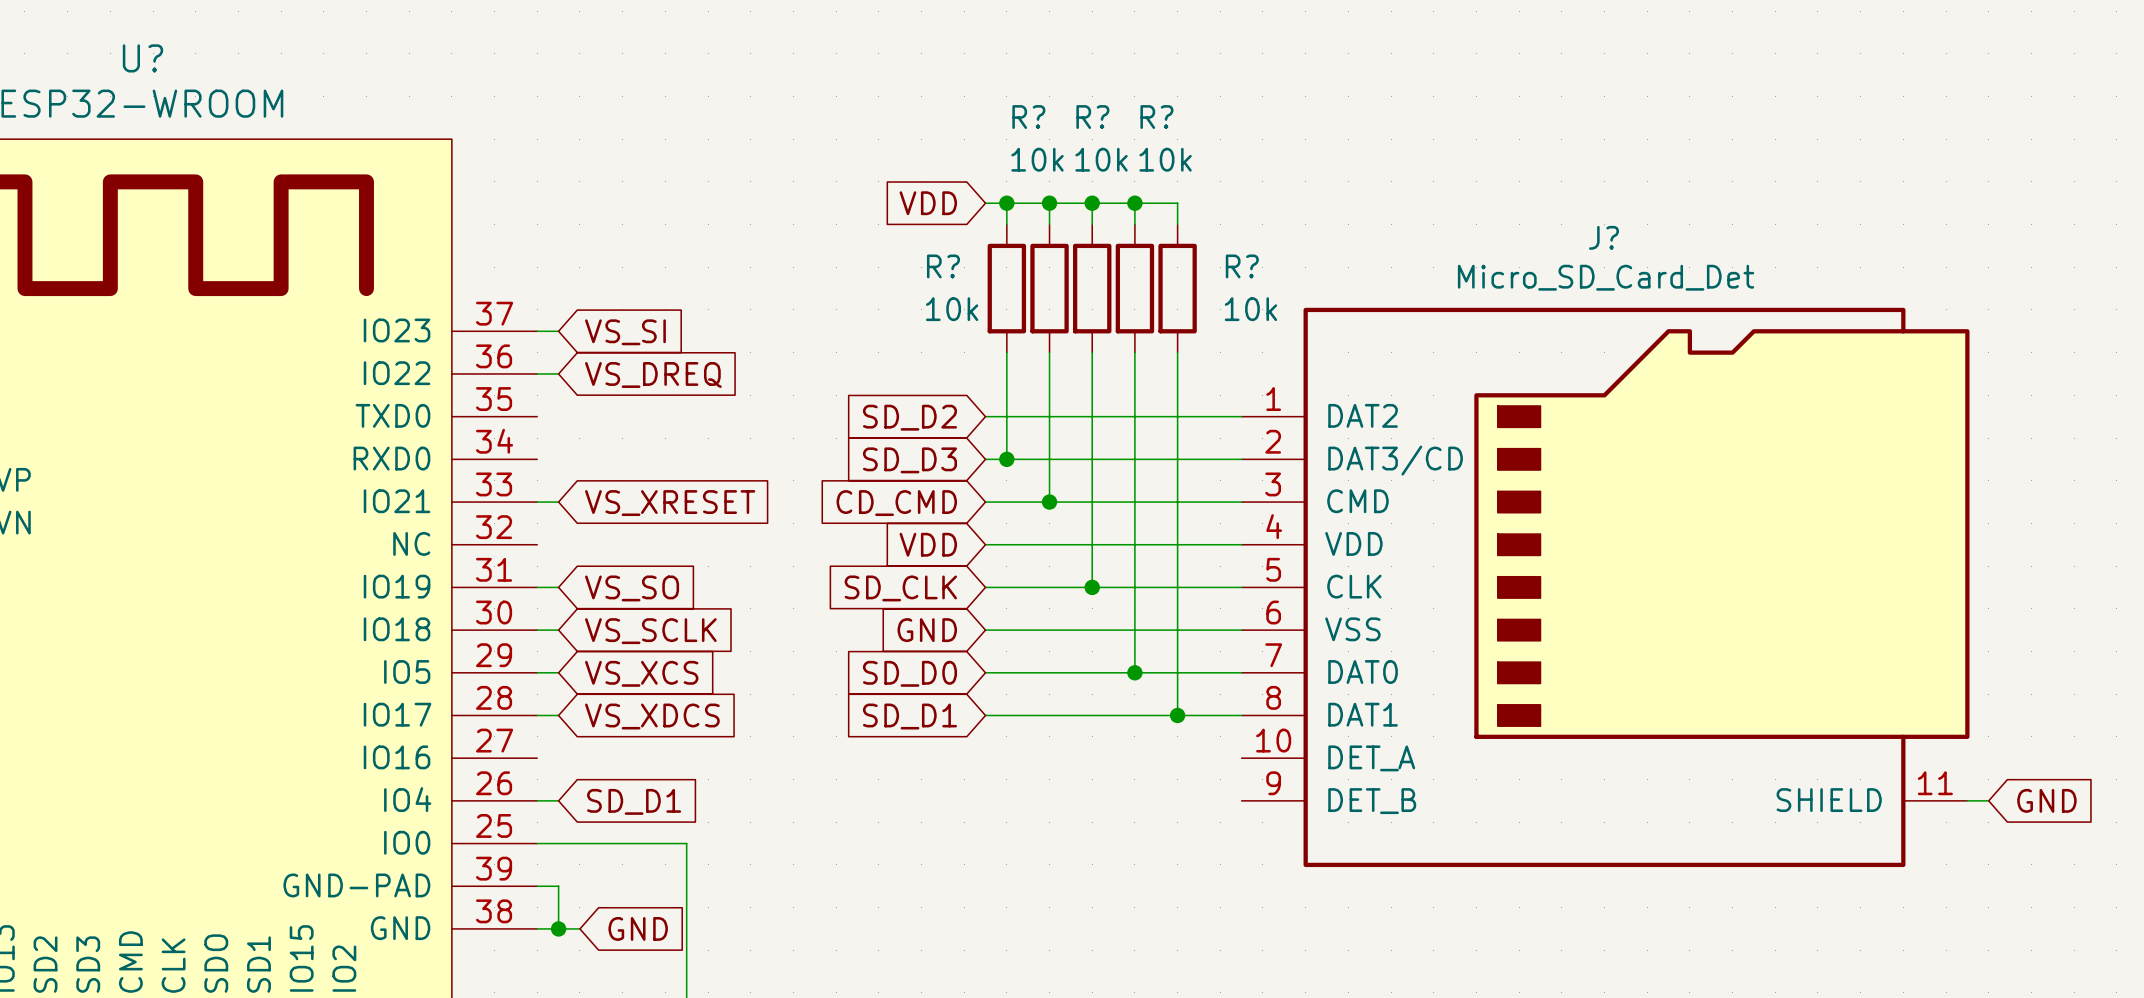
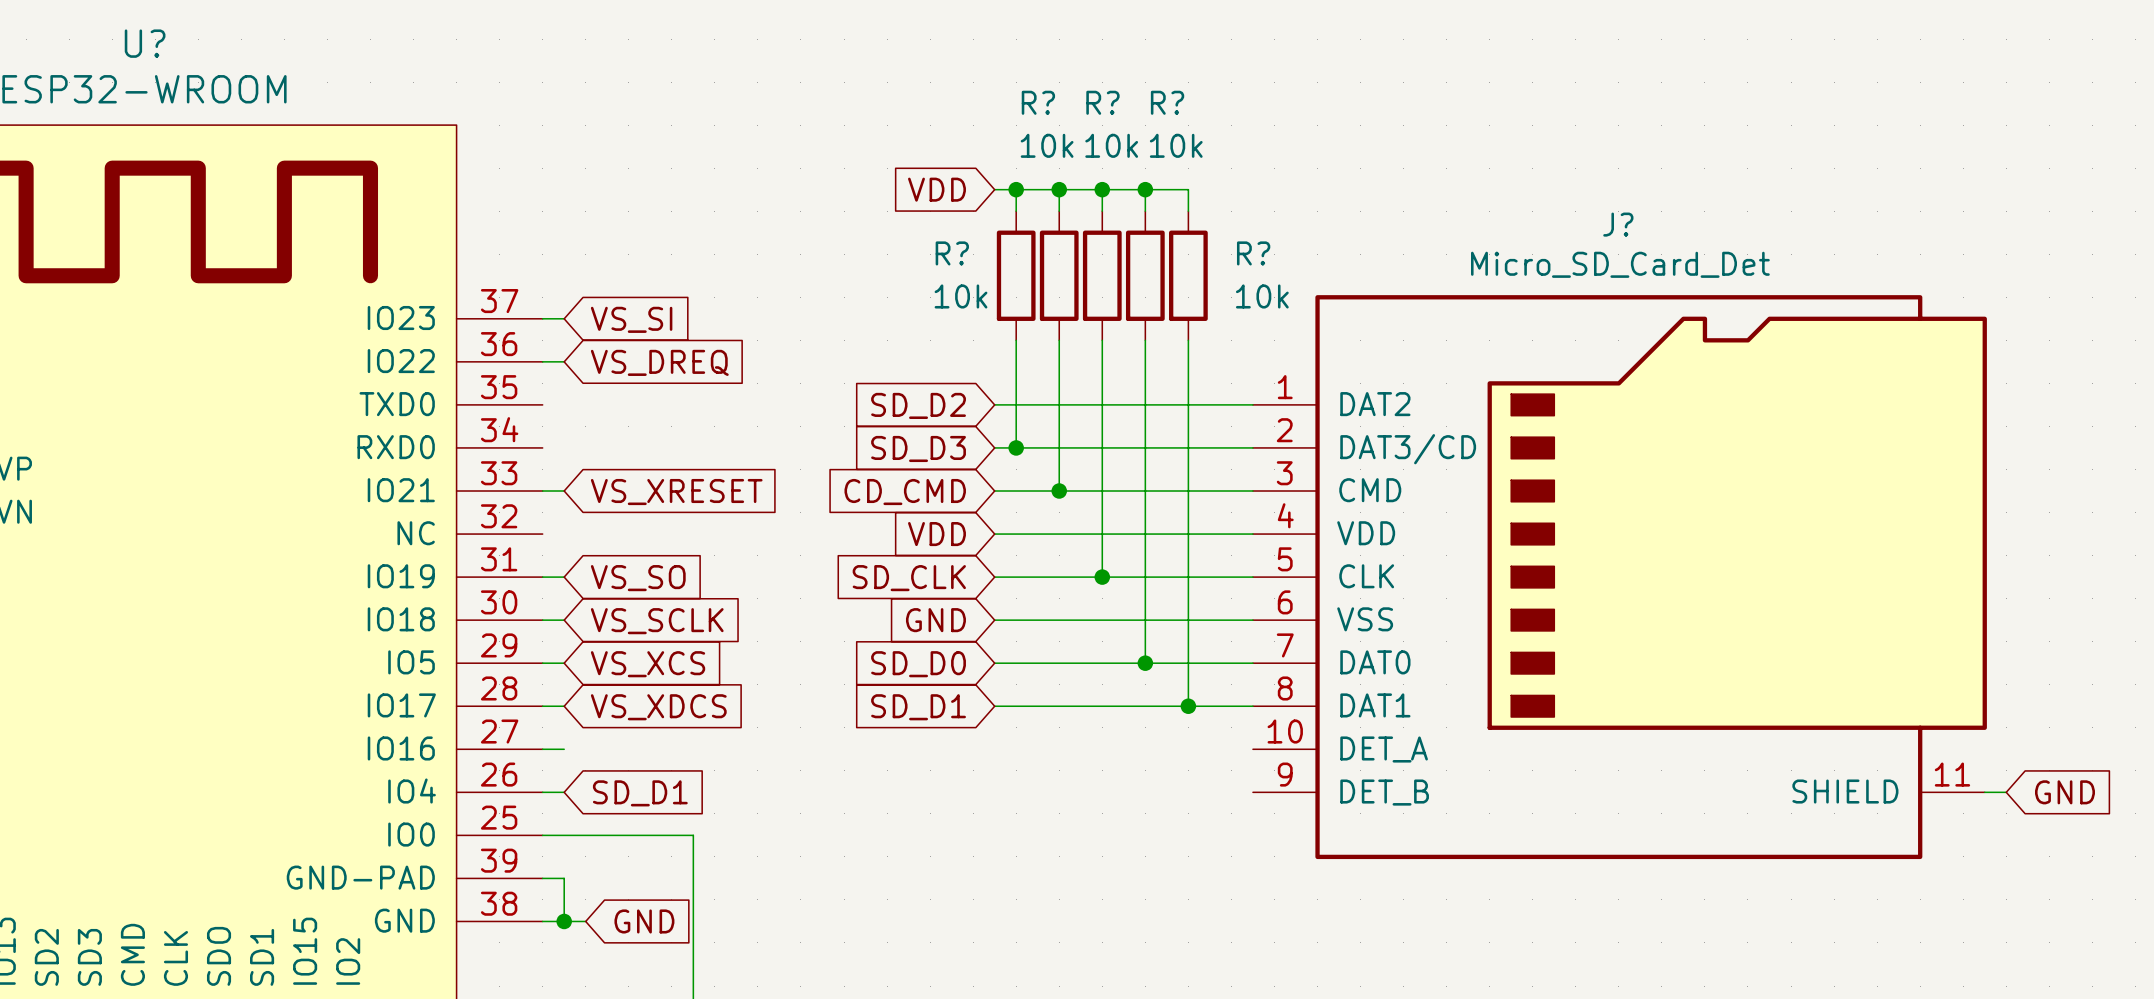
wire: none -> (542, 749) (564, 749)

